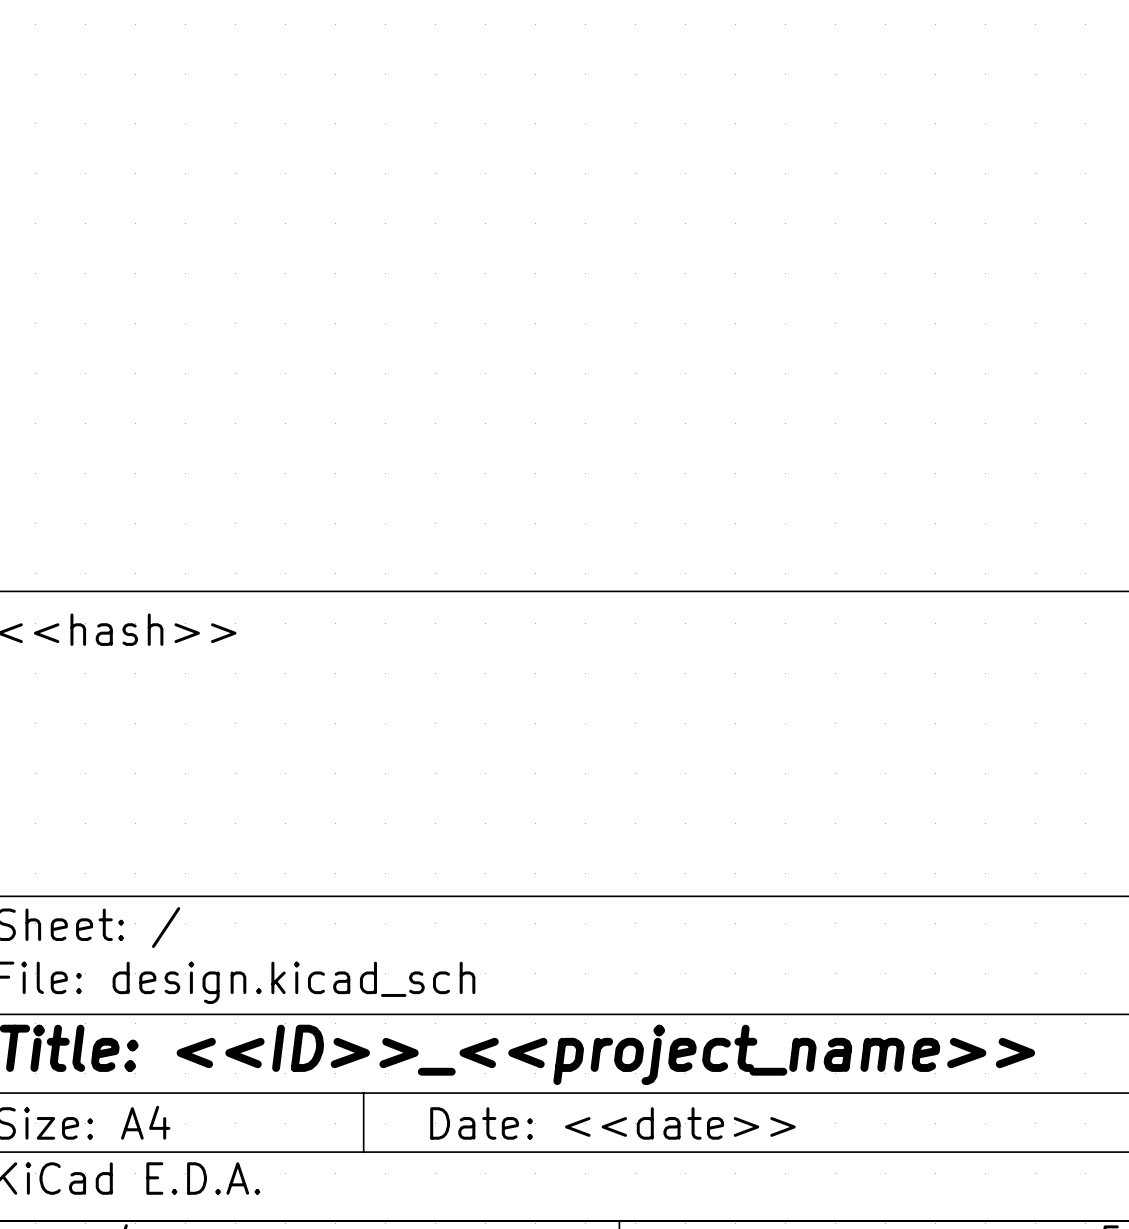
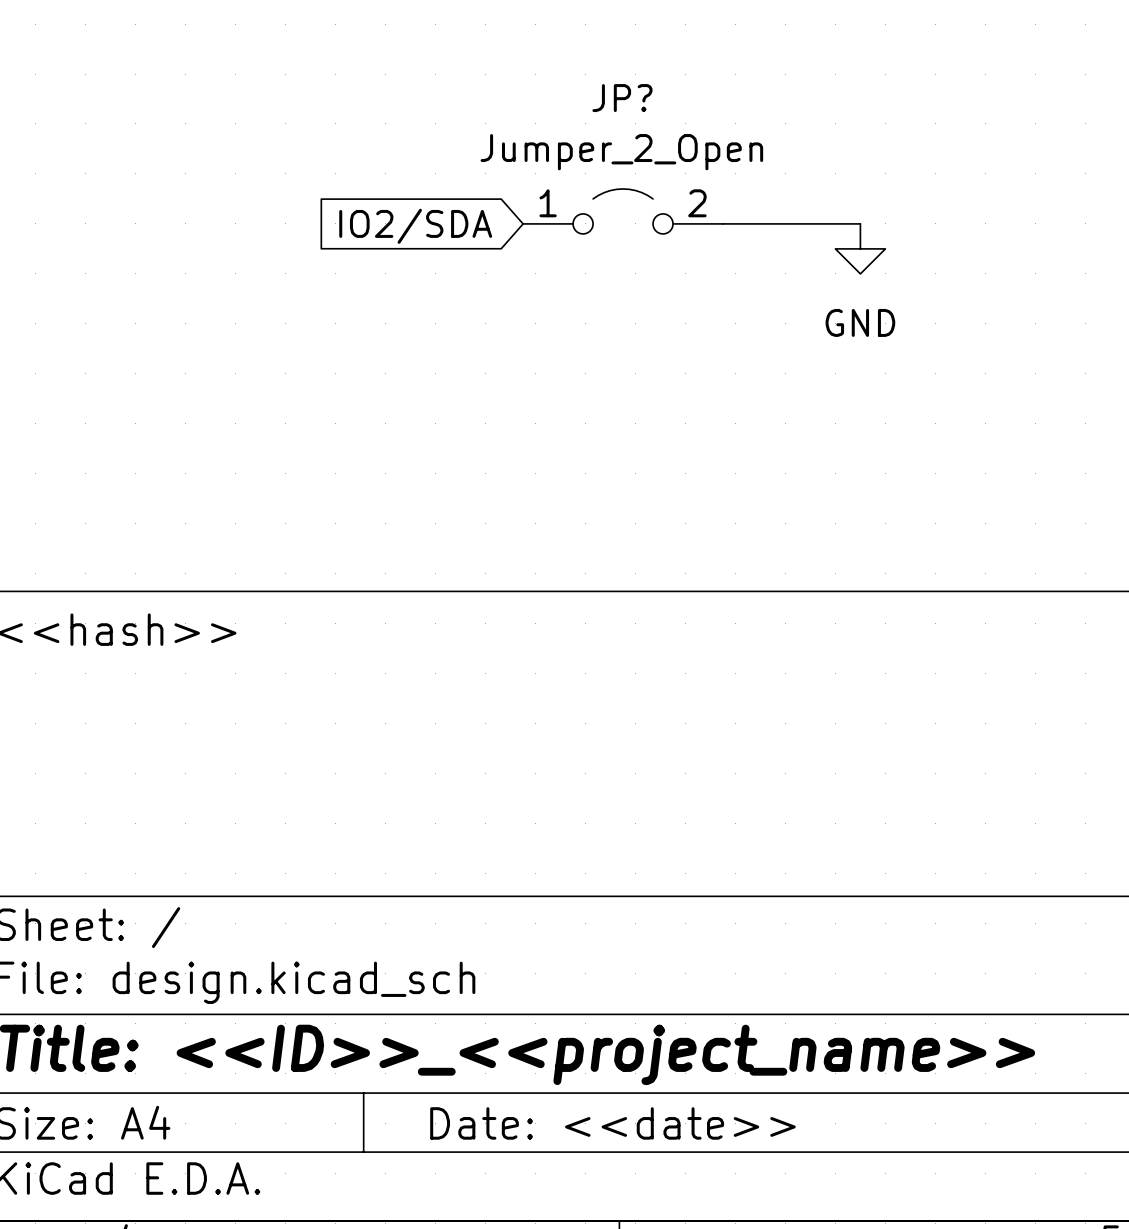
JP?: none -> Jumper_2_Open (623, 211)
wire: none -> (722, 223) (860, 223)
global label: none -> IO2/SDA (415, 226)
power symbol: none -> GND (860, 248)

